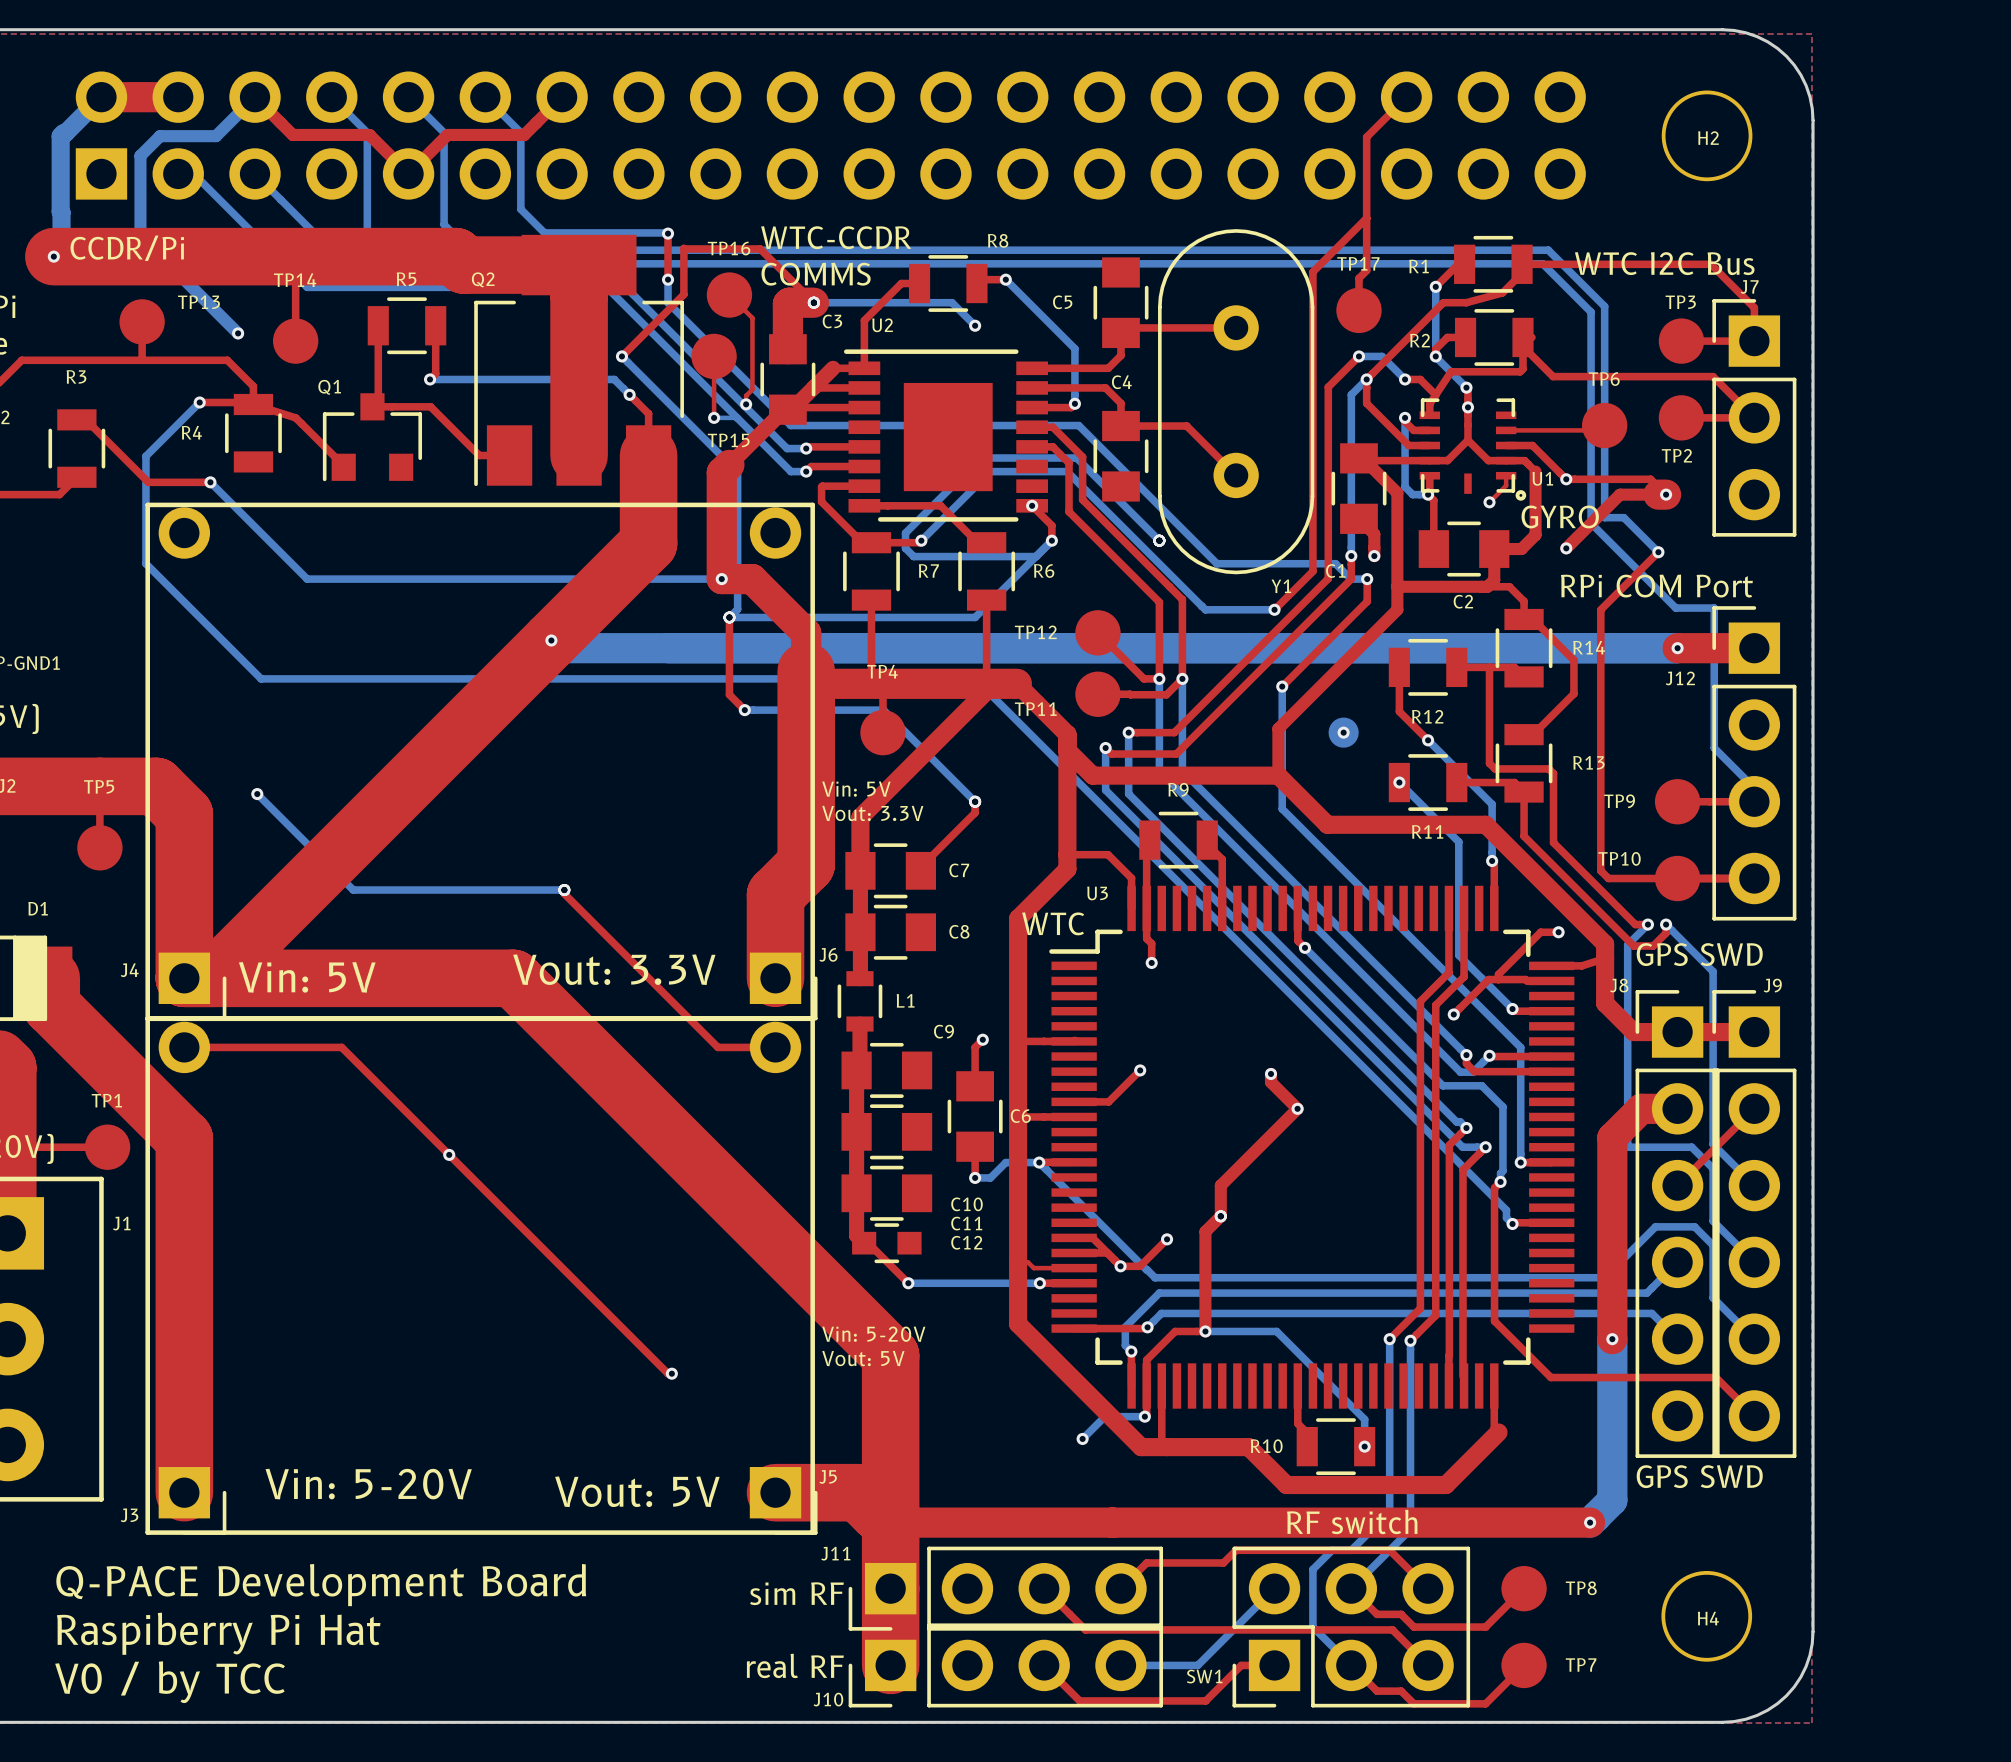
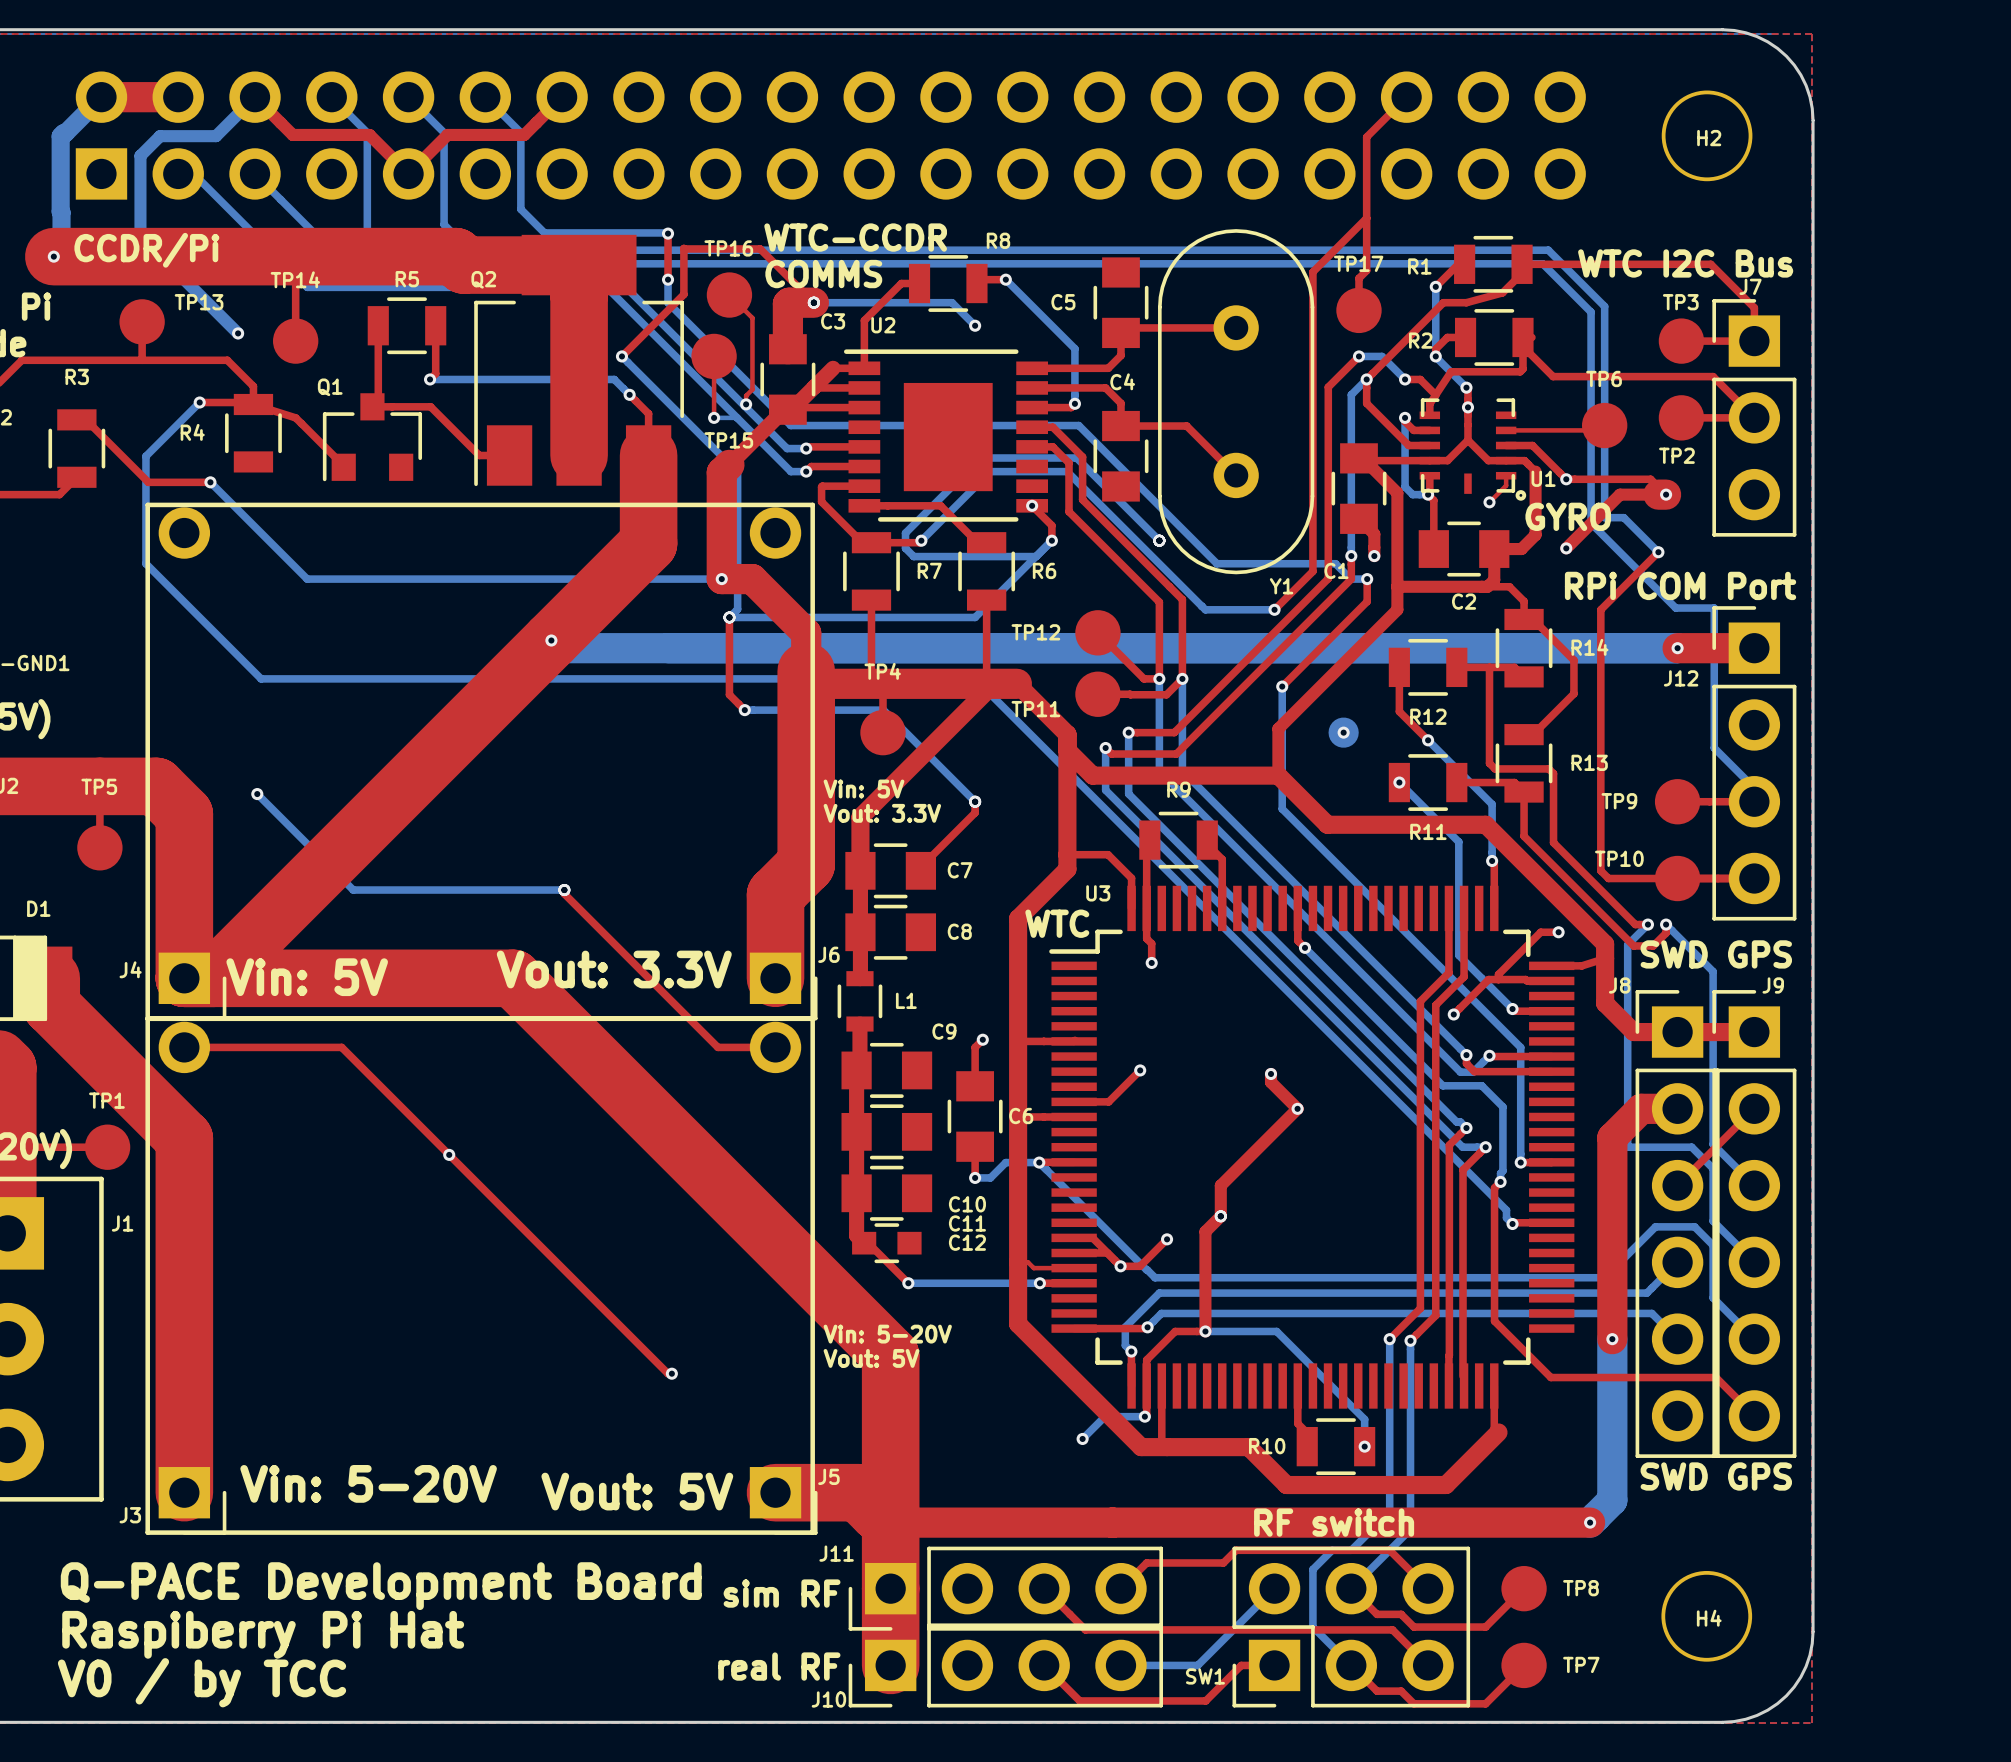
text: GPS SWD (1699, 954) -> SWD GPS (1716, 954)
text: GPS SWD (1699, 1476) -> SWD GPS (1716, 1476)

